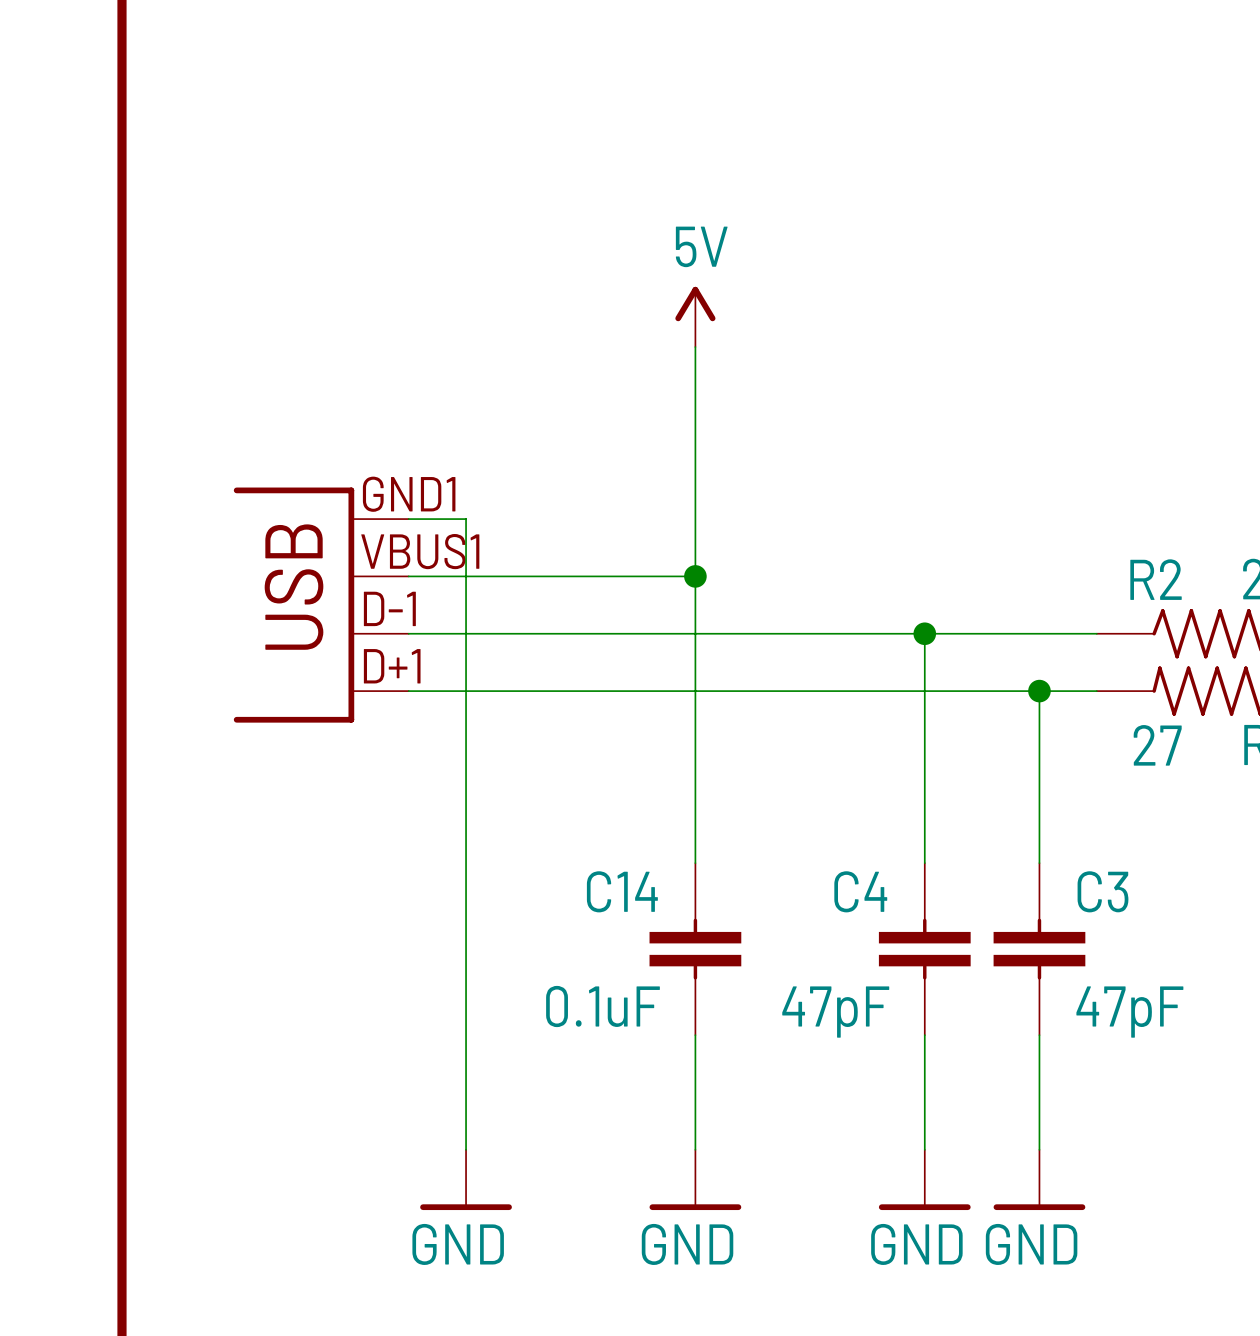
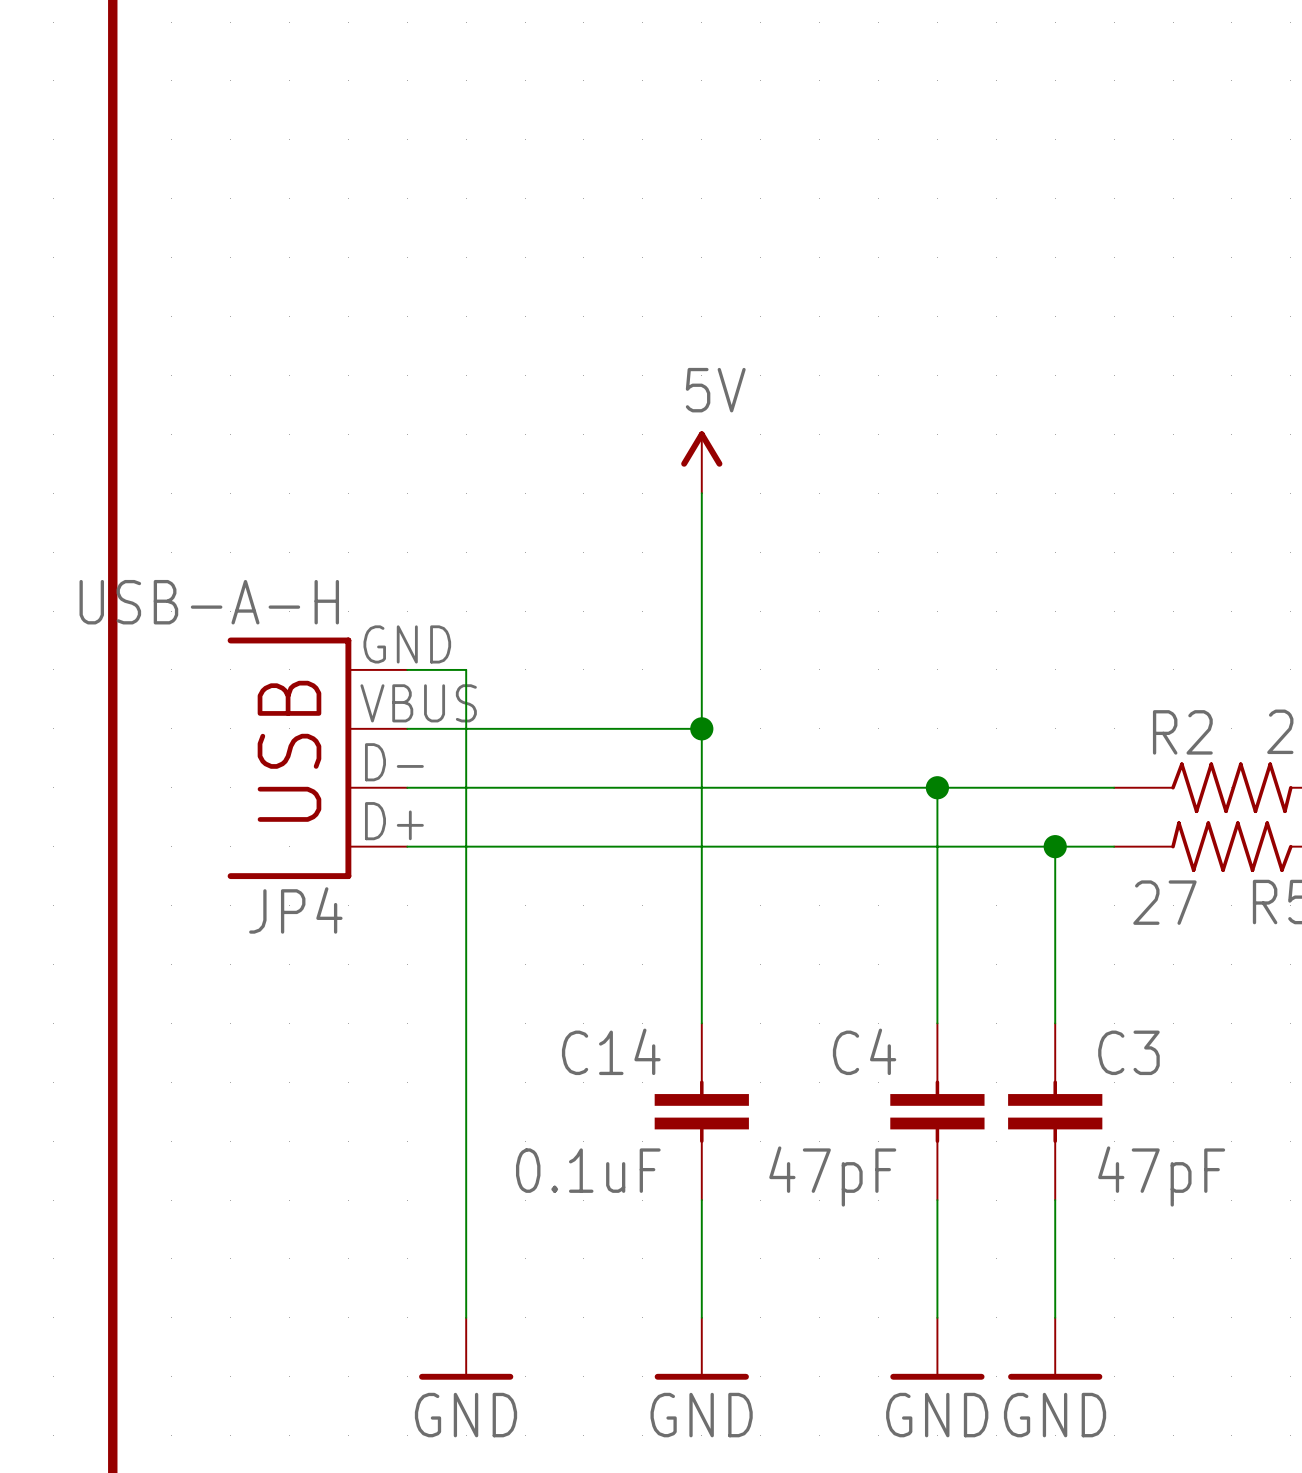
JP4 value: none -> USB-A-H (209, 602)
JP4 pin number: GND1 (409, 494) -> GND (407, 644)
JP4 pin number: VBUS1 (420, 551) -> VBUS (418, 703)
JP4 pin number: D-1 (389, 608) -> D- (394, 762)
JP4 pin number: D+1 (392, 666) -> D+ (394, 821)
JP4 name: none -> JP4 (295, 910)

